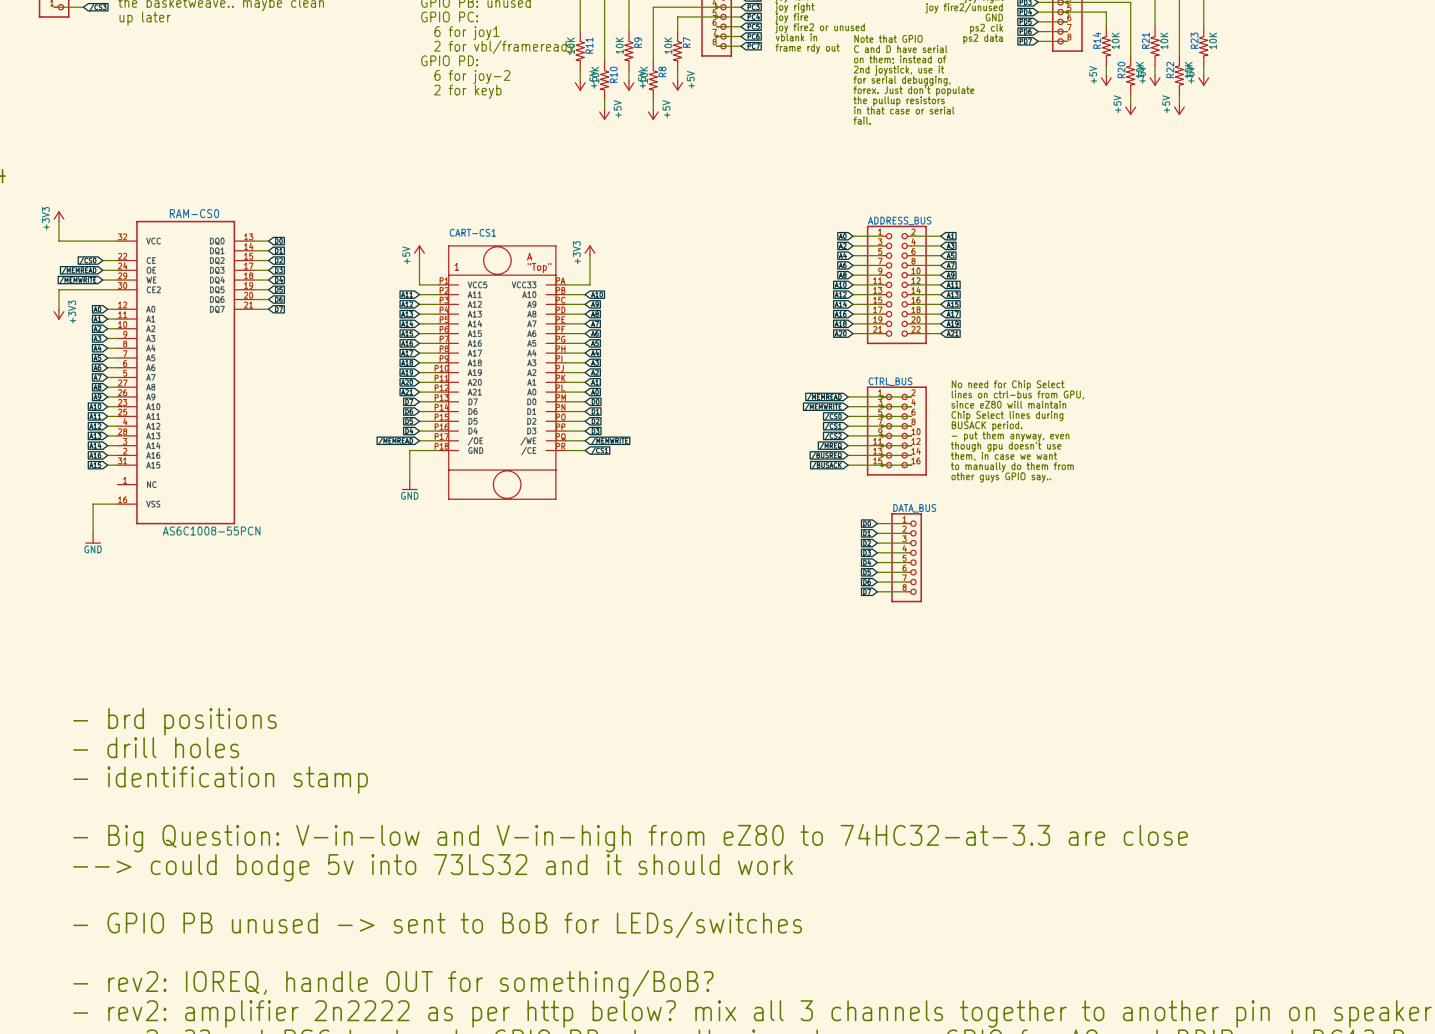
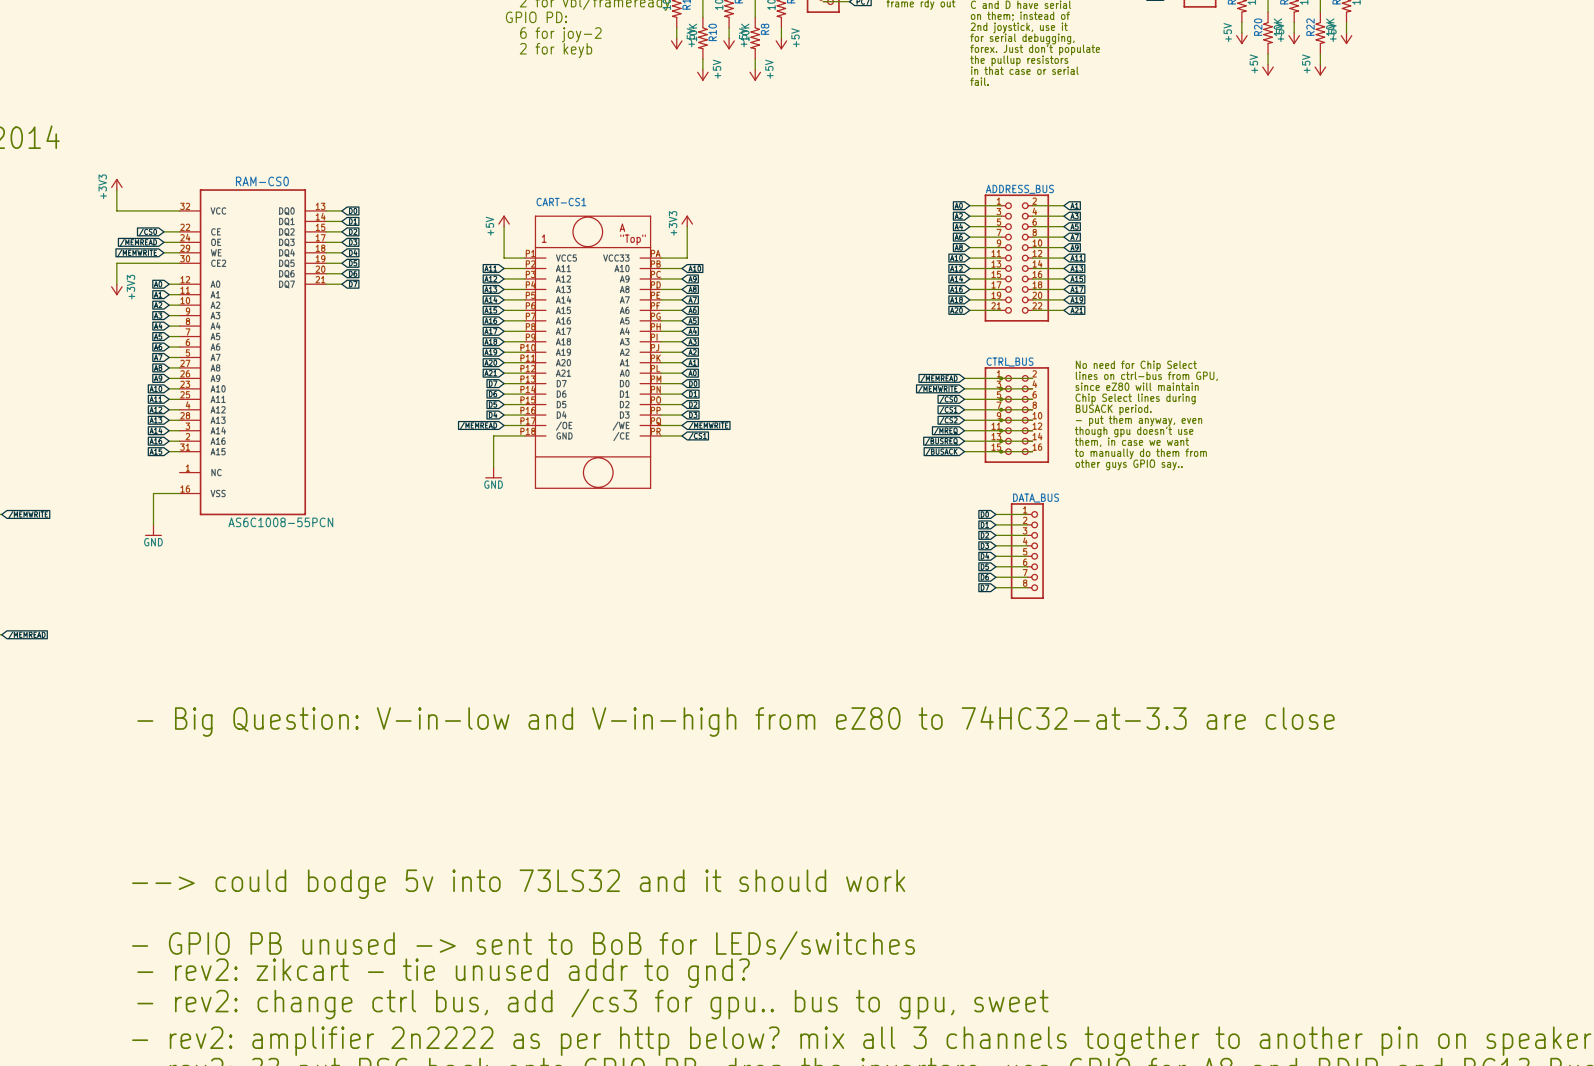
text: none -> - Big Question: V-in-low and V-in-high from eZ80 to 74HC32-at-3.3 are close (736, 721)
text: - brd positions (174, 721) -> none
text: - drill holes (156, 747) -> none
text: - identification stamp (220, 780) -> none
text: - Big Question: V-in-low and V-in-high from eZ80 to 74HC32-at-3.3 are close (630, 838) -> none
text: none -> - rev2: zikcart - tie unused addr to gnd? (443, 973)
text: none -> - rev2: change ctrl bus, add /cs3 for gpu.. bus to gpu, sweet (592, 1004)
text: - rev2: IOREQ, handle OUT for something/BoB? (393, 984) -> none

